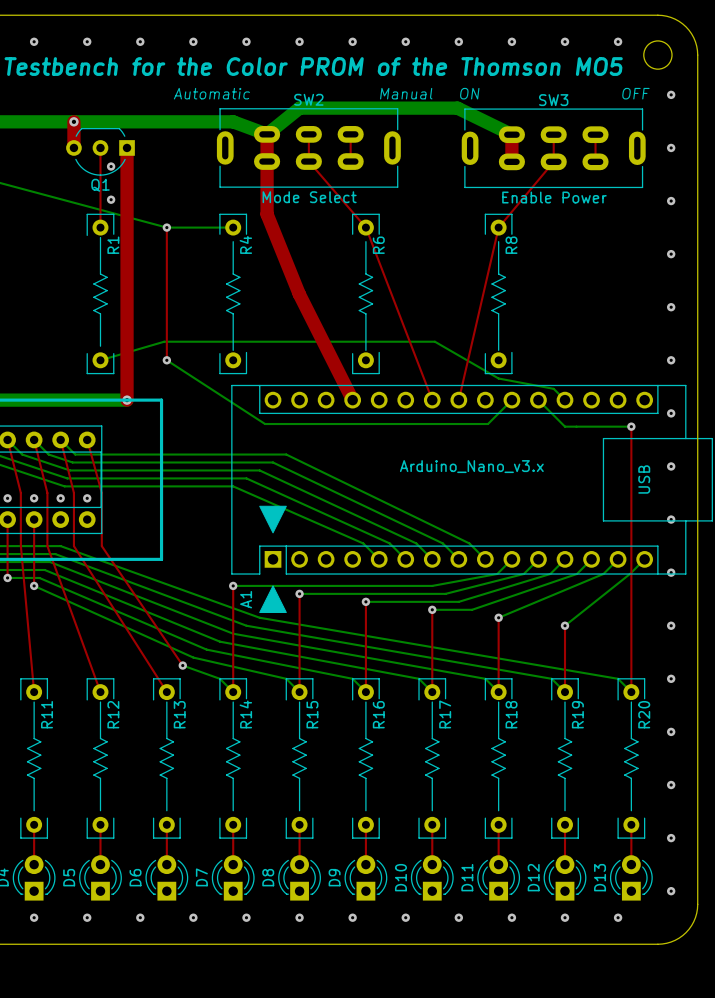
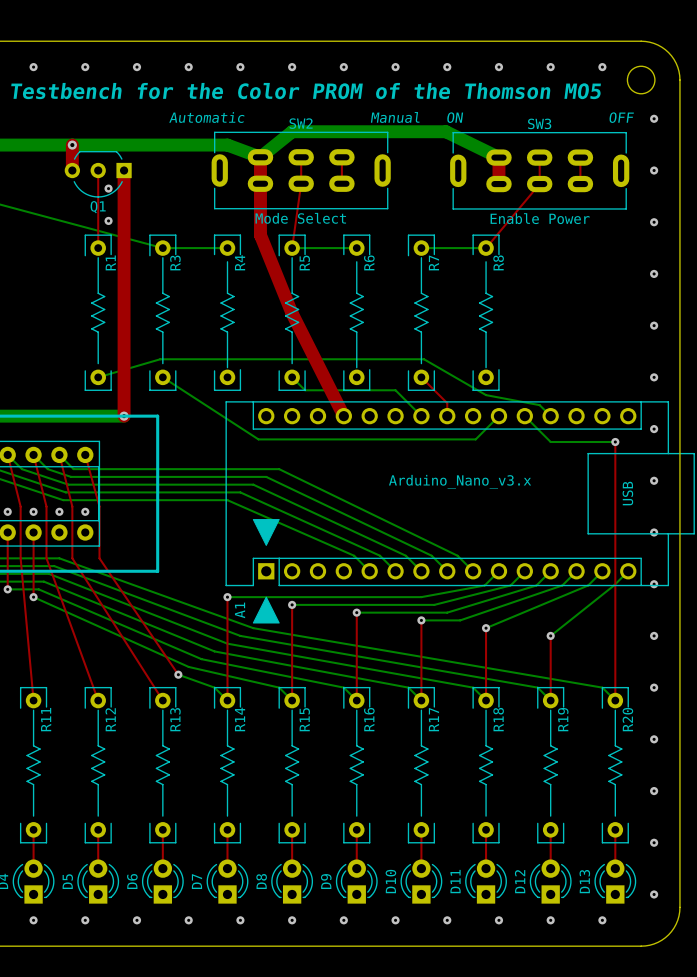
top track: (308, 161) (365, 227) (432, 400) -> (301, 183) (292, 248)
top track: (166, 227) (166, 360) -> none
via: (166, 227) -> none
bottom track: none -> (292, 248) (356, 248)
bottom track: none -> (421, 248) (486, 248)
top track: (498, 227) (458, 400) -> (421, 377) (447, 403) (447, 416)
R3: none -> (162, 312)
R5: none -> (292, 312)
R7: none -> (421, 312)
via: (166, 360) -> none
bottom track: none -> (292, 377) (305, 390) (395, 390) (421, 416)

